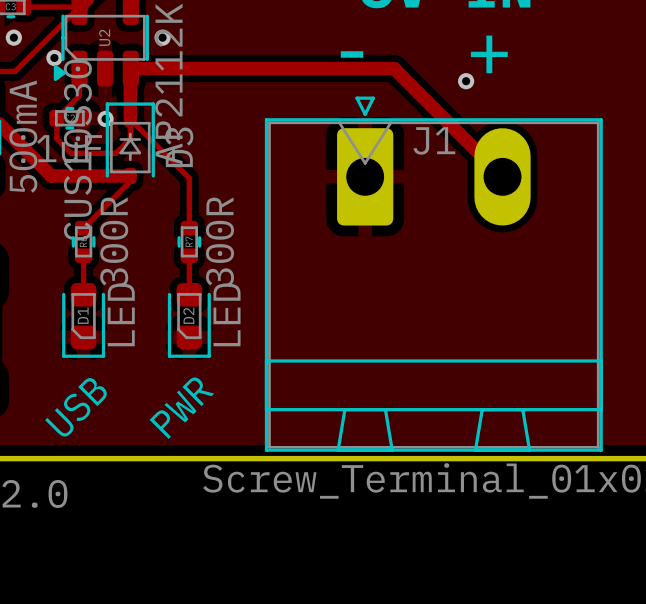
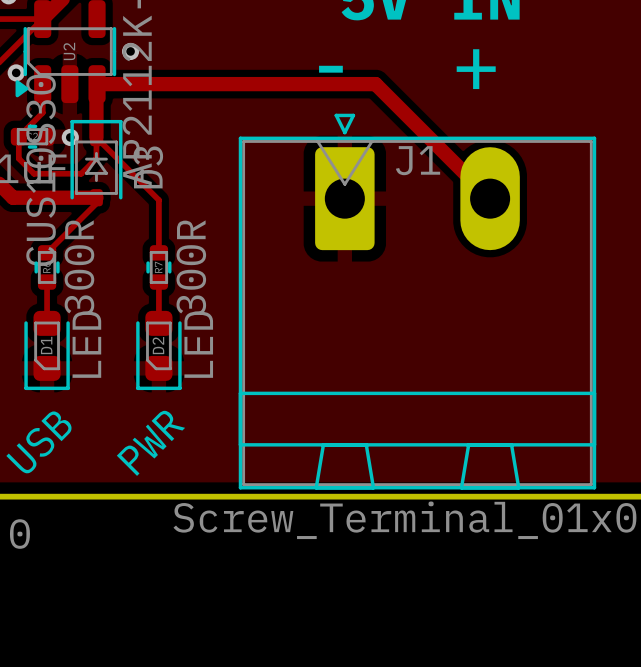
via: (466, 81) -> none

